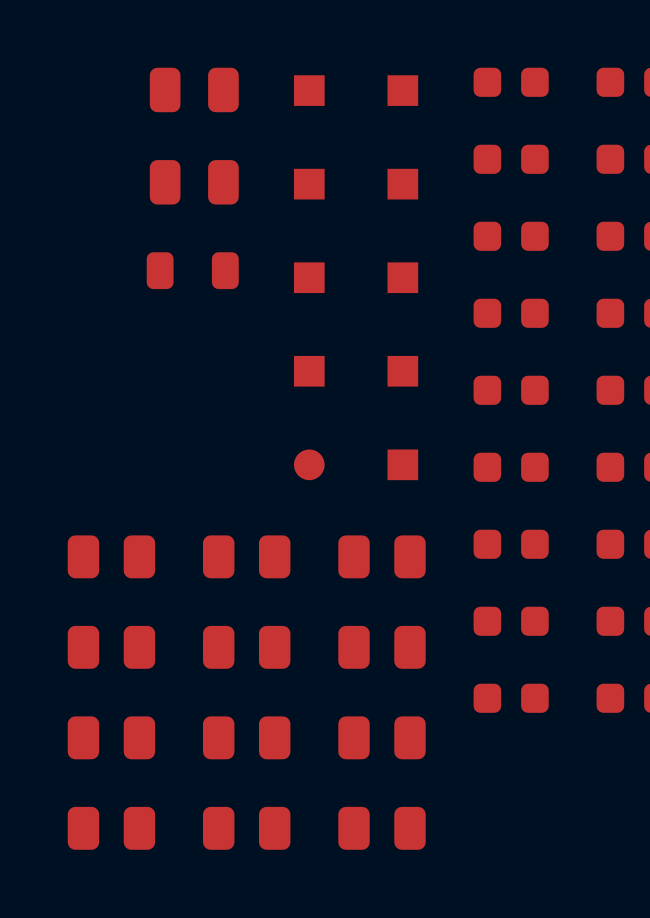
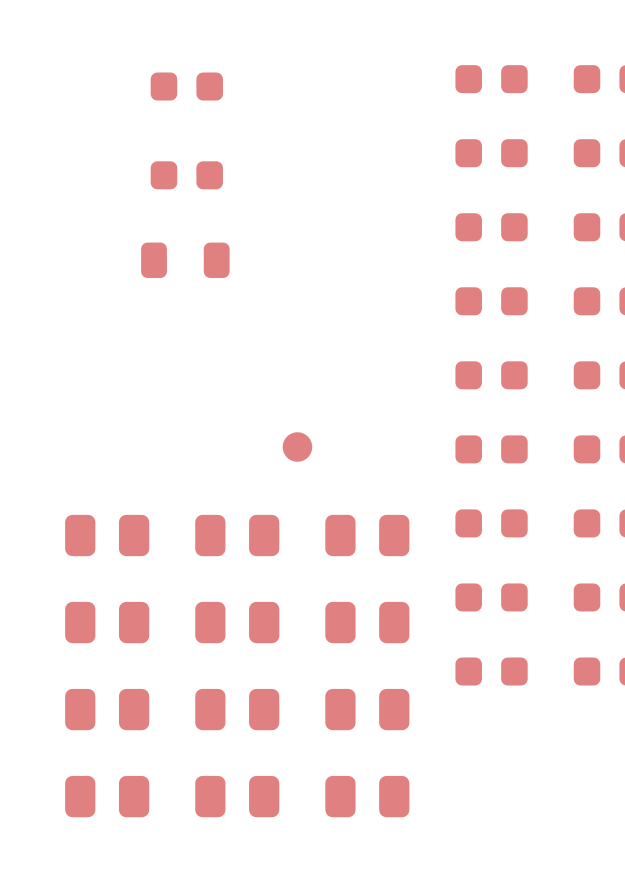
part footprint: [149, 67, 239, 113] -> [150, 72, 223, 101]
part: (309, 90) -> none
part: (402, 90) -> none
part footprint: [149, 160, 239, 205] -> [150, 161, 223, 190]
part: (309, 184) -> none
part: (402, 184) -> none
part: (309, 277) -> none
part: (402, 277) -> none
part: (309, 371) -> none
part: (402, 371) -> none
part: (402, 464) -> none

